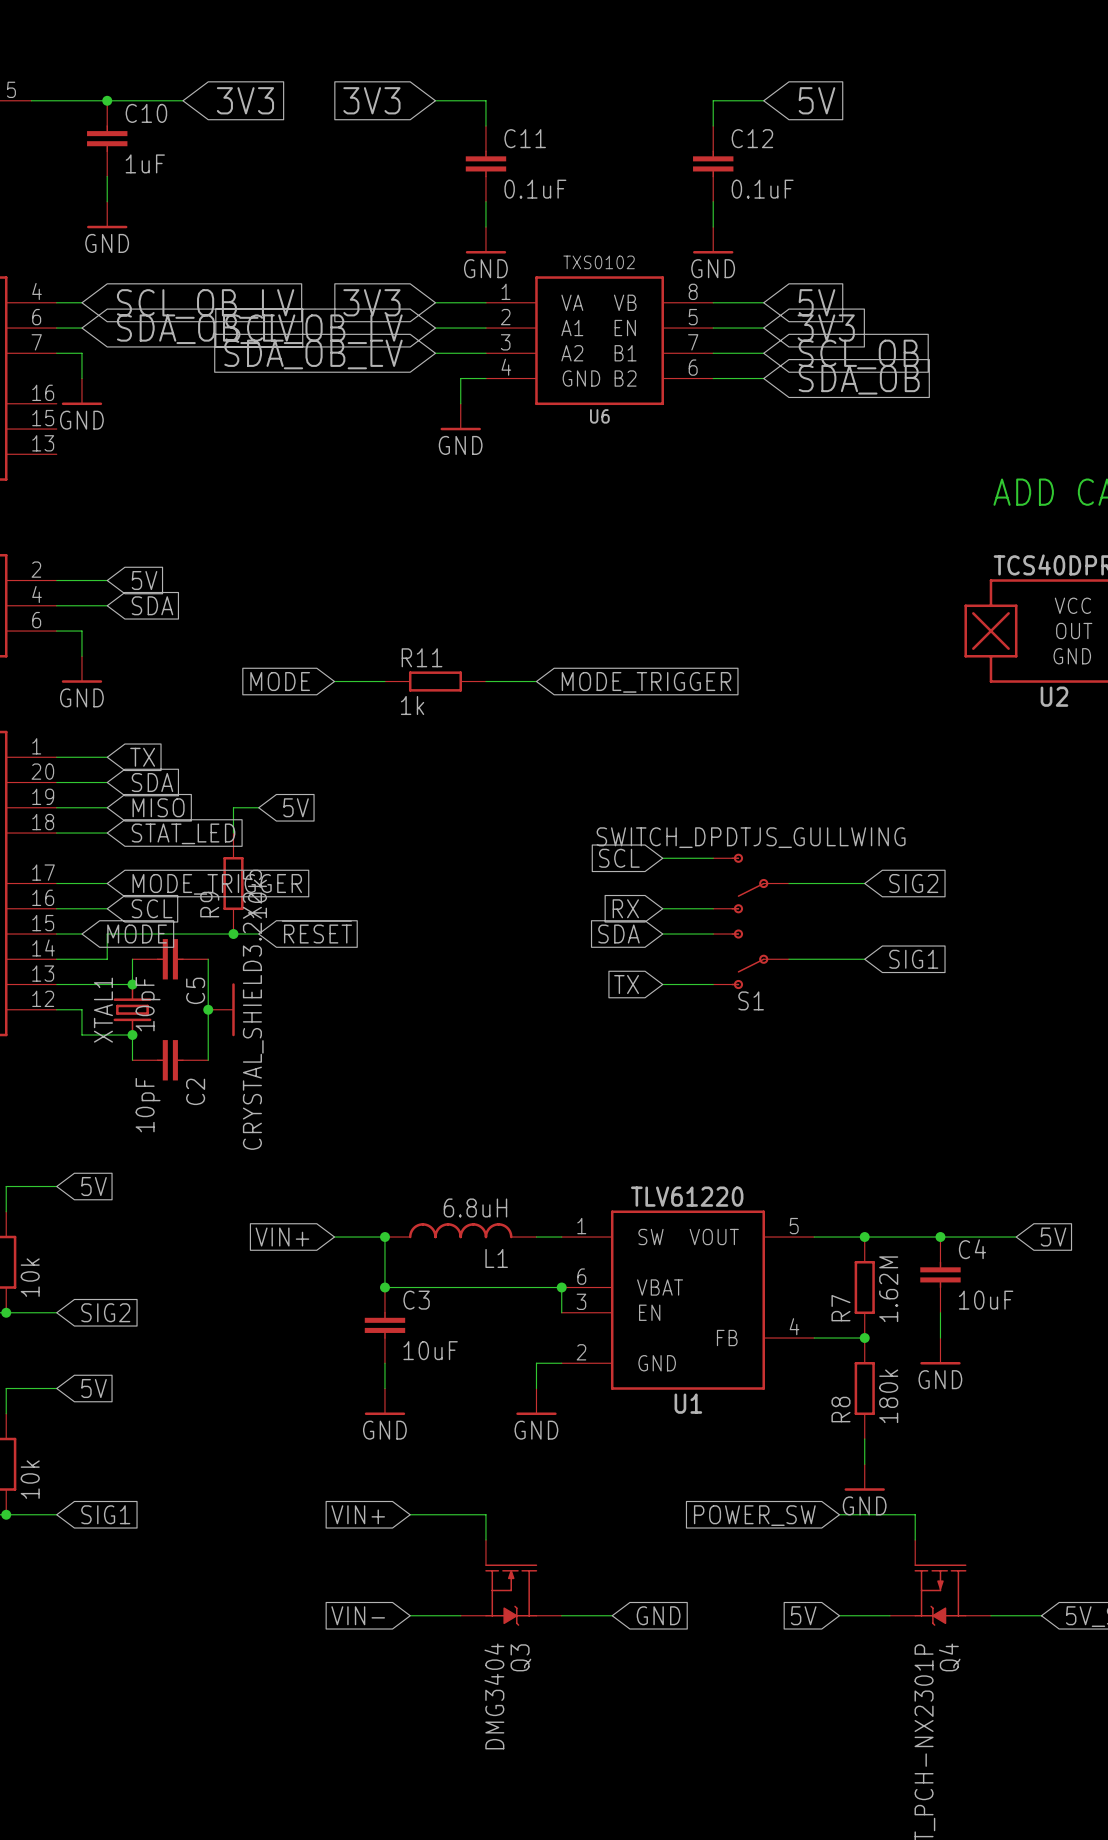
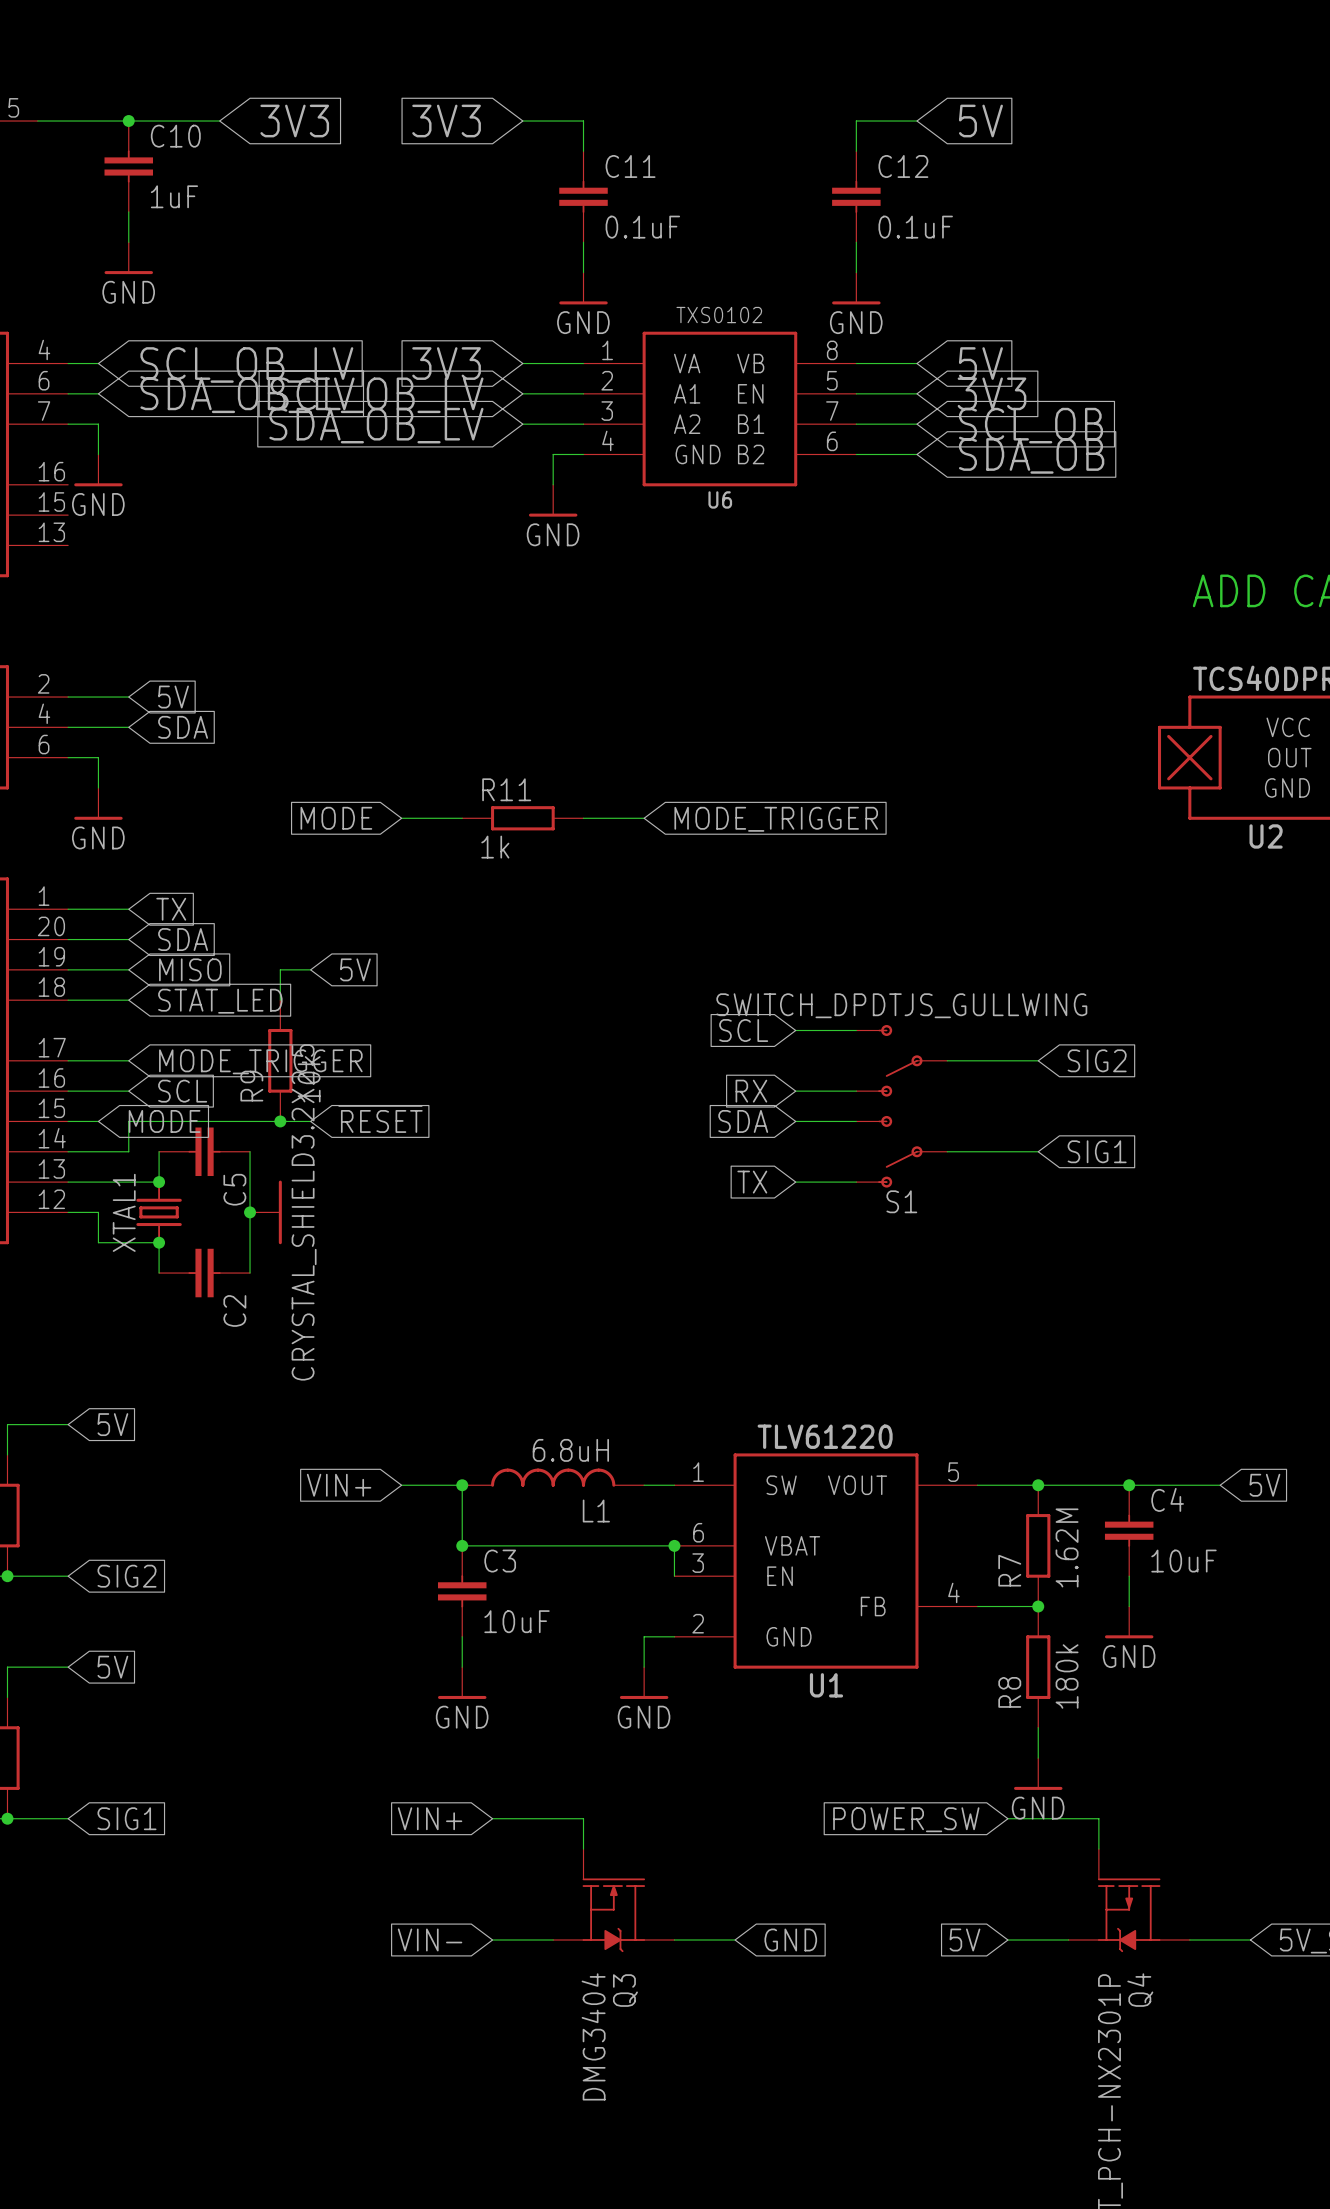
C5 value: 10pF (148, 1004) -> none
C2 value: 10pF (148, 1105) -> none
part value: 10k (30, 1277) -> none
part value: 10k (30, 1479) -> none

